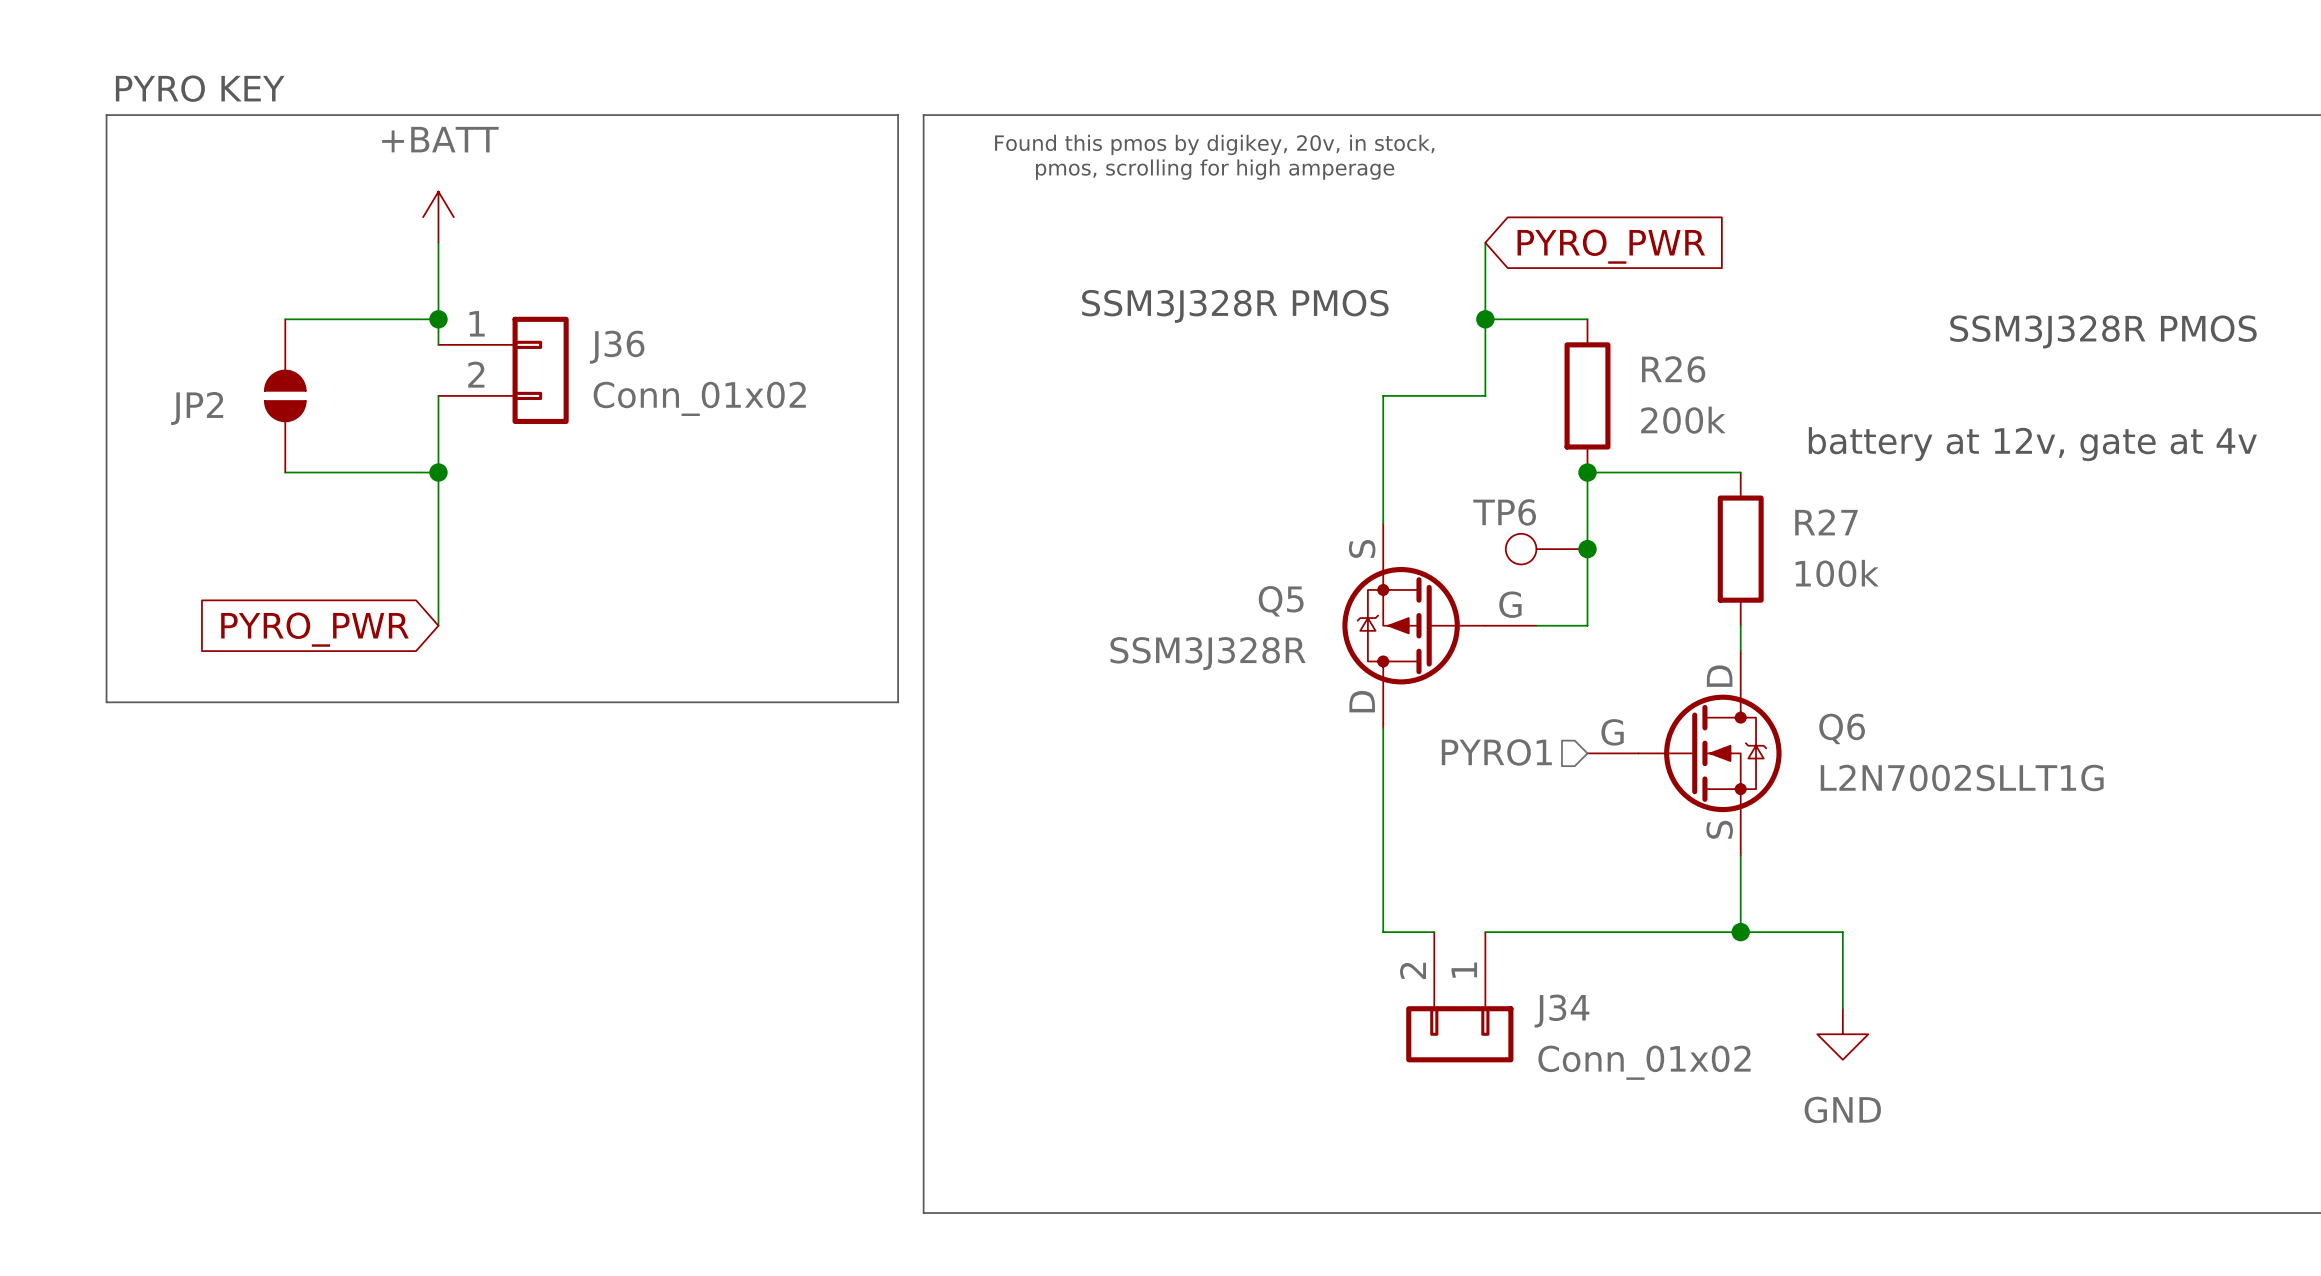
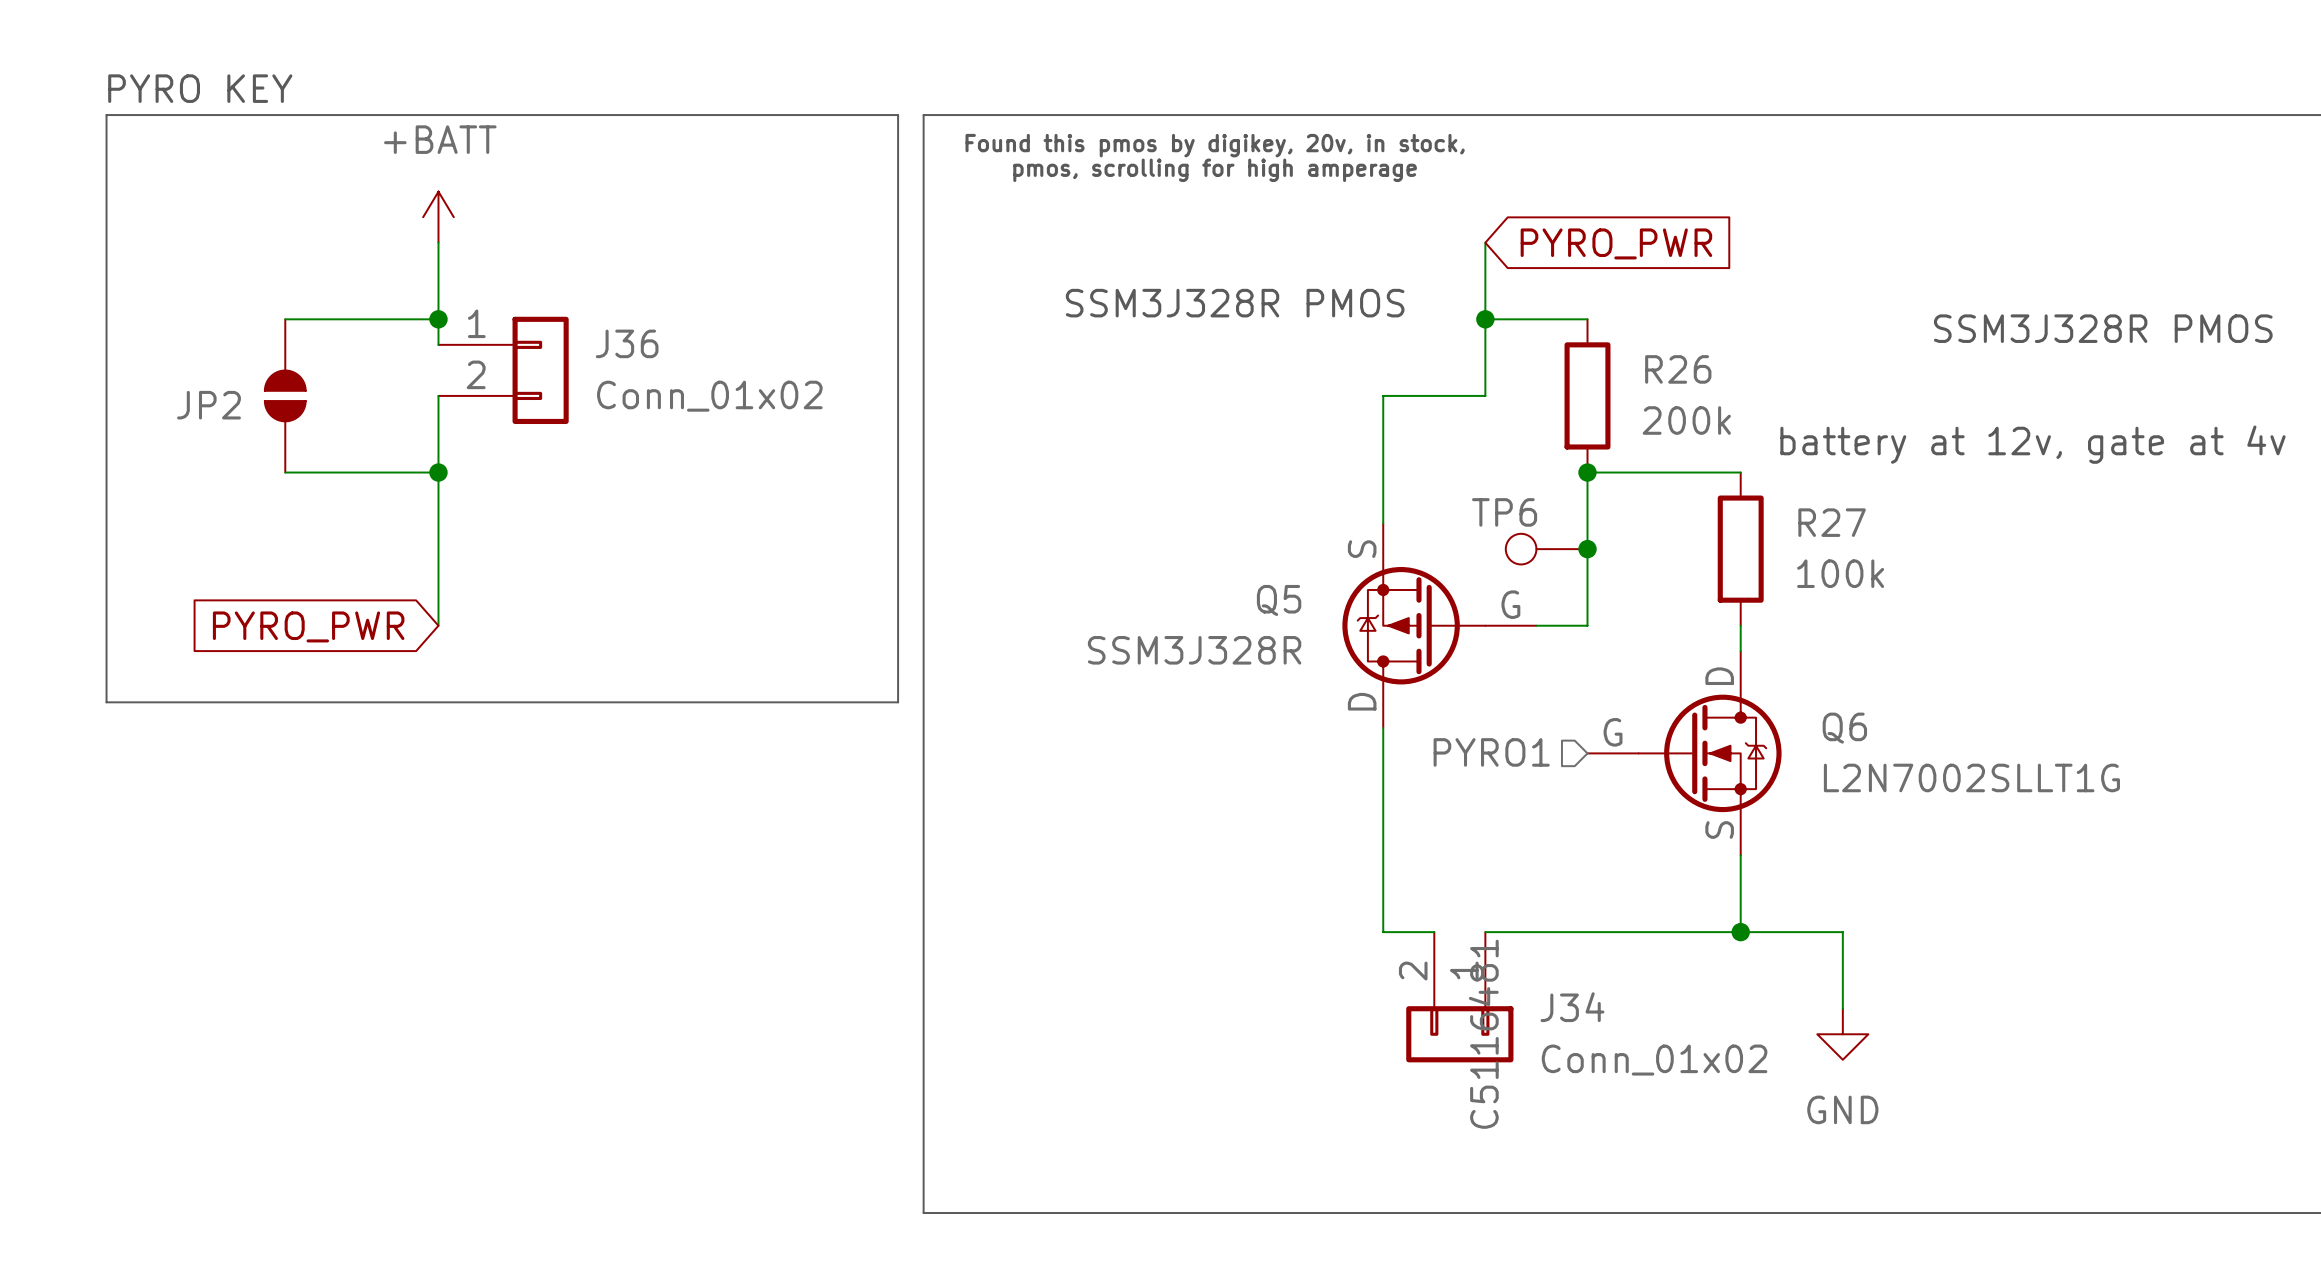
J34 text: none -> C5116481 (1483, 1034)

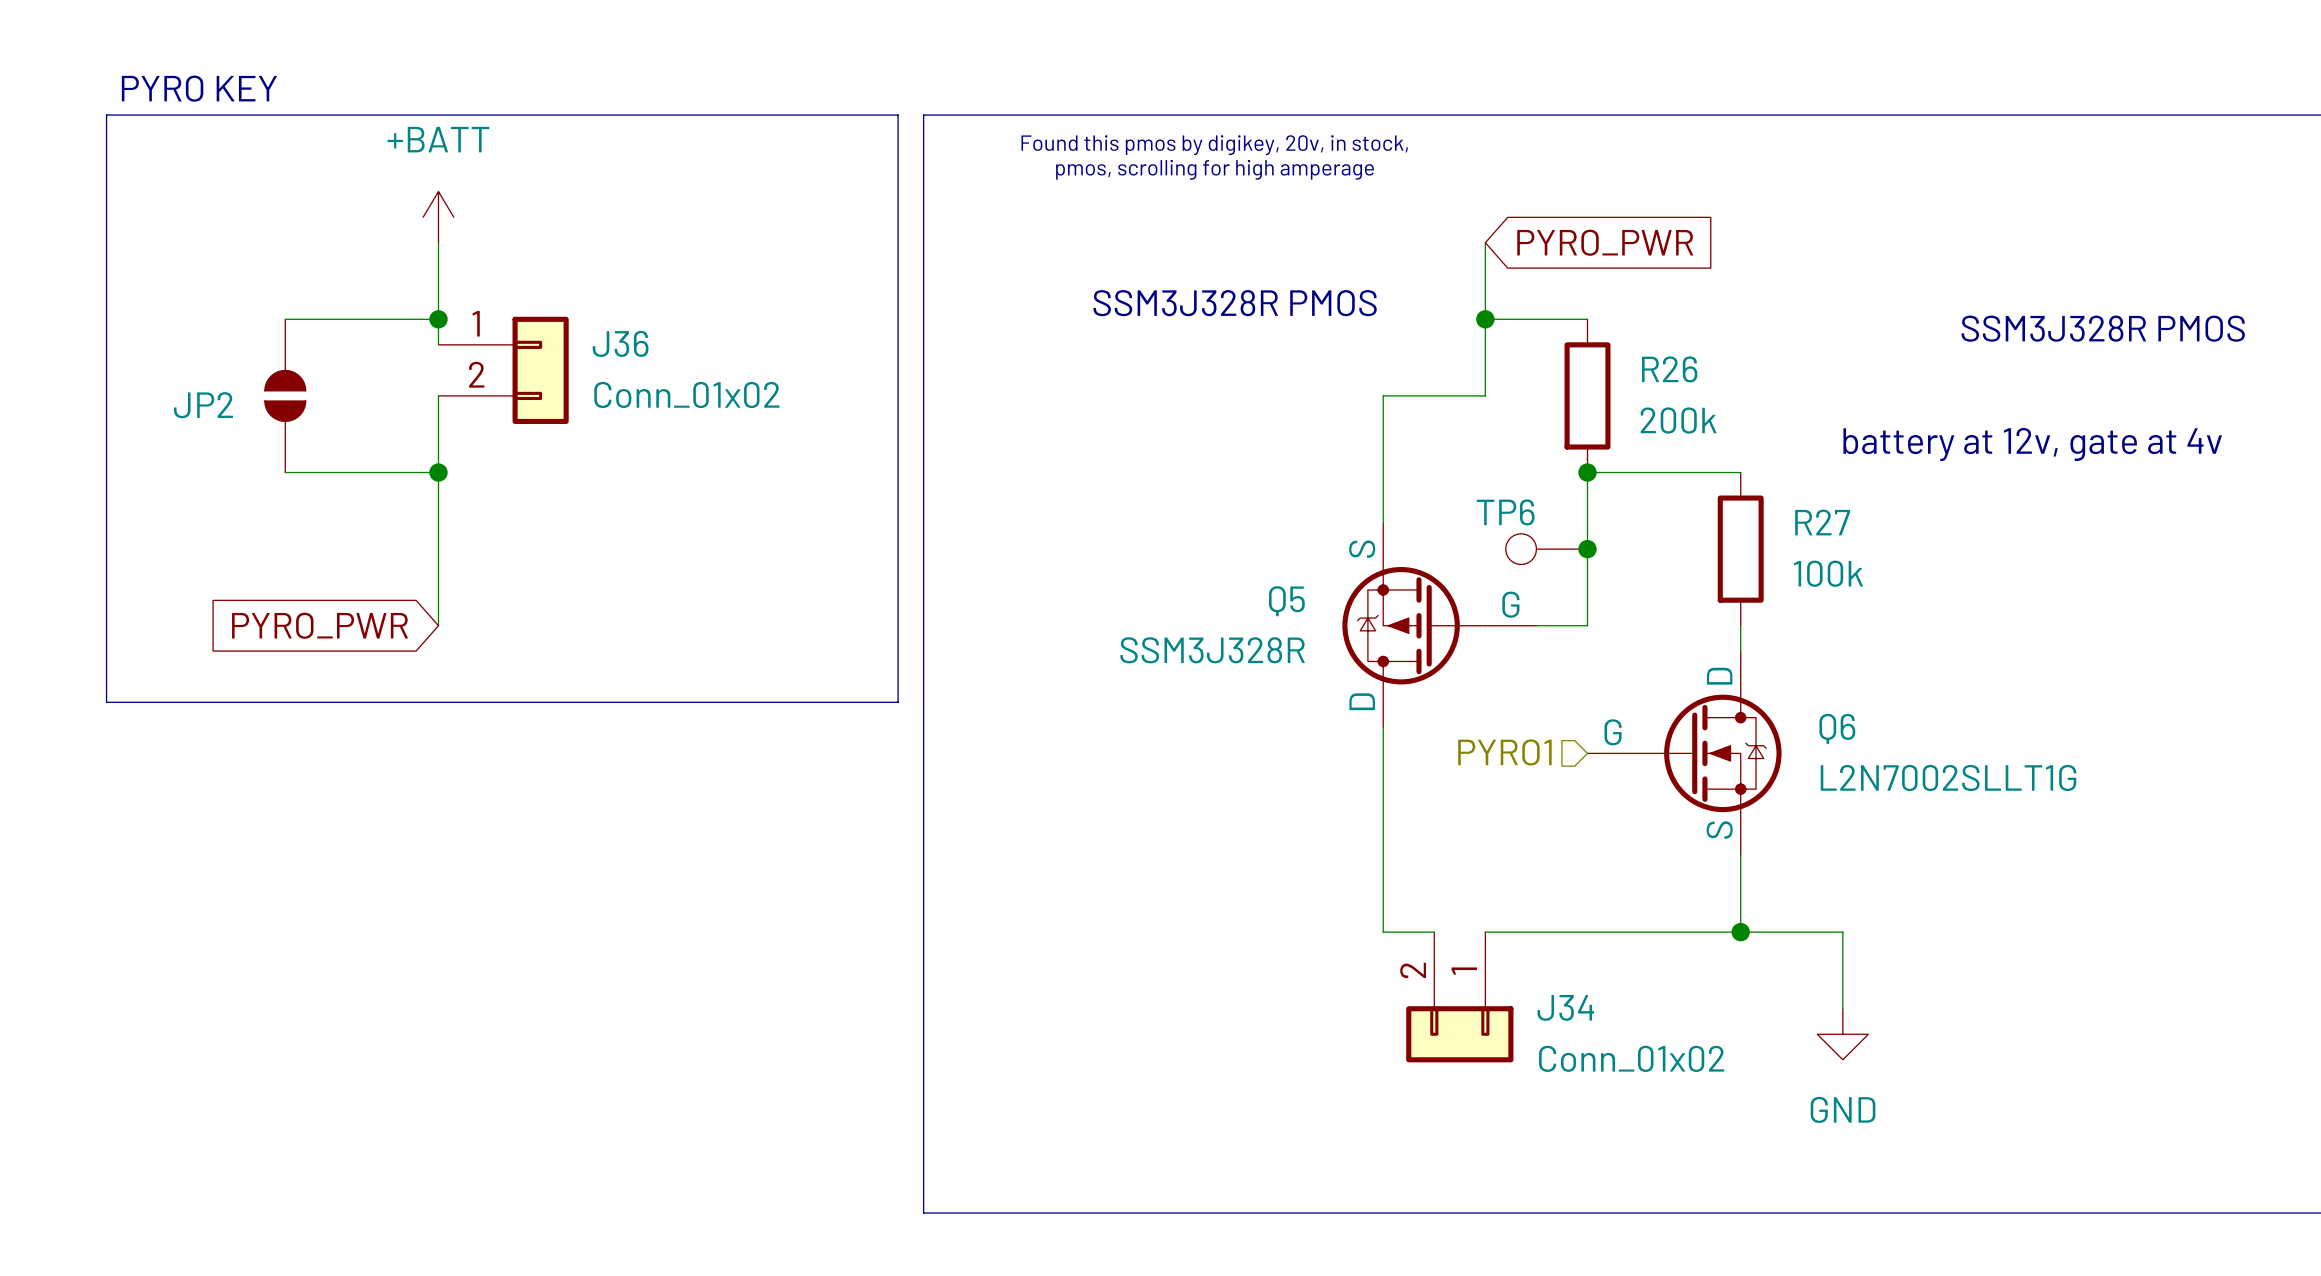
J34 text: C5116481 (1483, 1034) -> none

